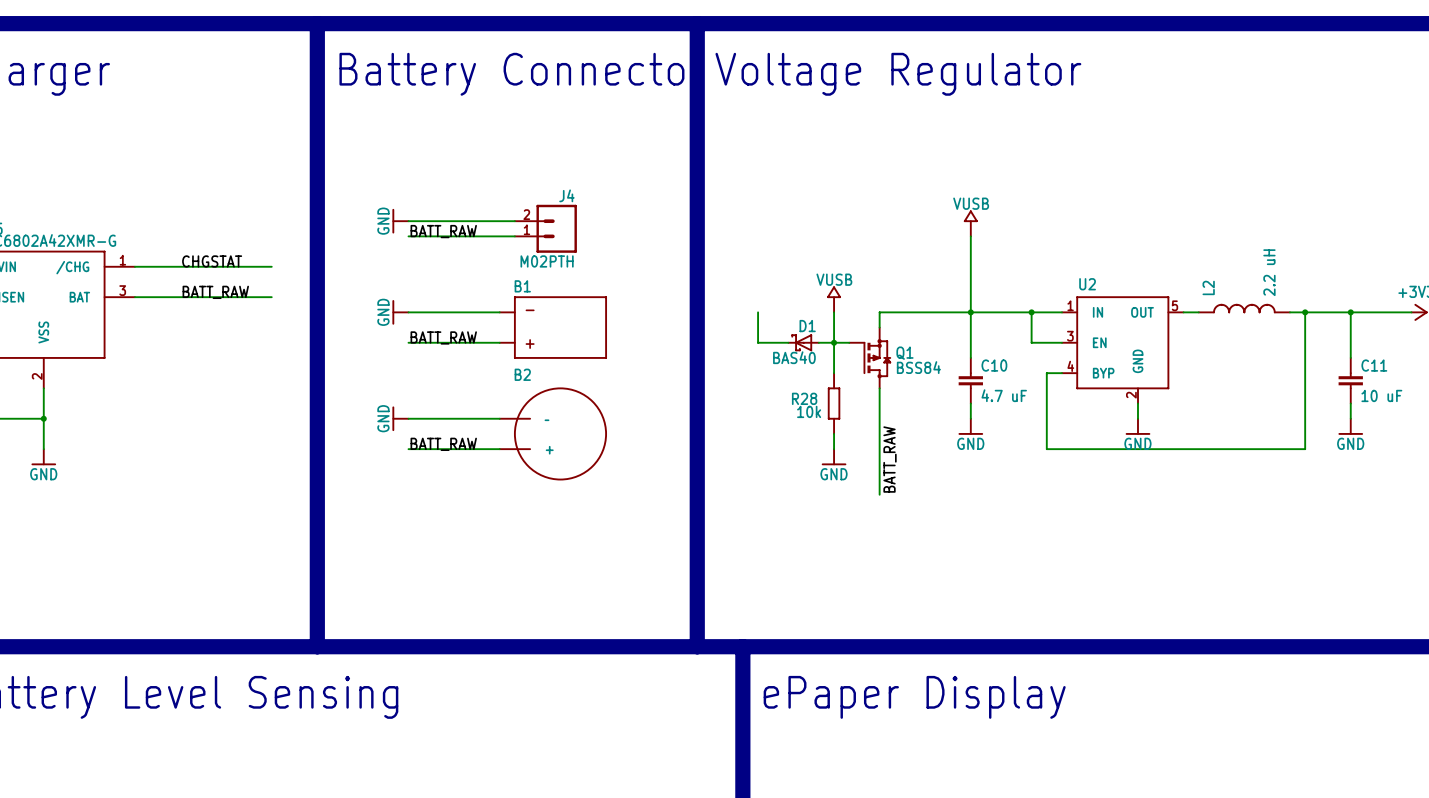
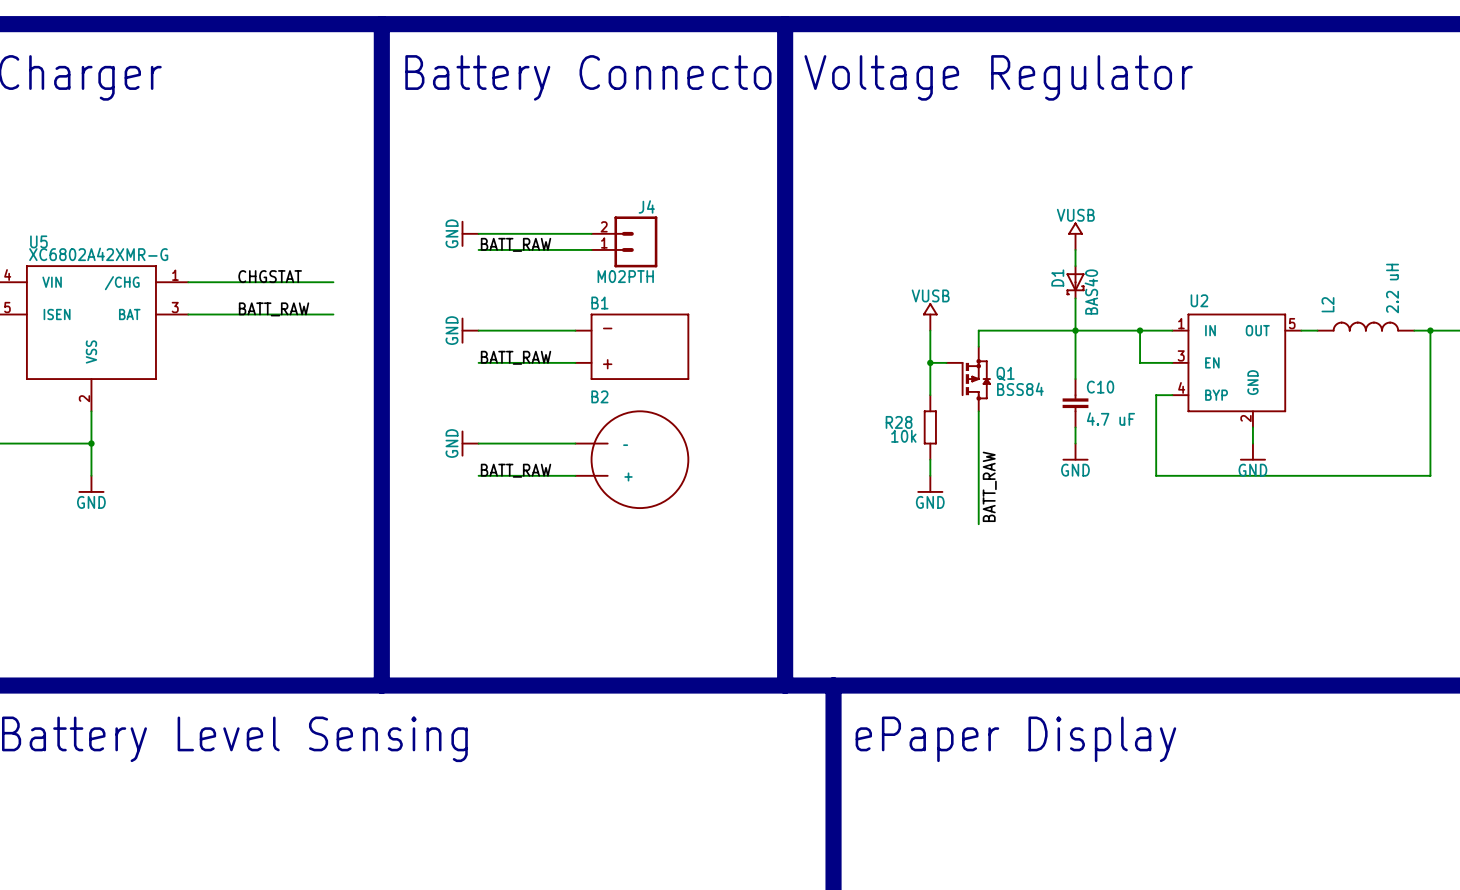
wire: (758, 312) (758, 342) (788, 342) -> none
D1 rotation: 0° (801, 342) -> 90° counterclockwise (1075, 284)
D1 position: (803, 342) -> (1075, 282)
wire: (818, 342) (834, 342) -> none

